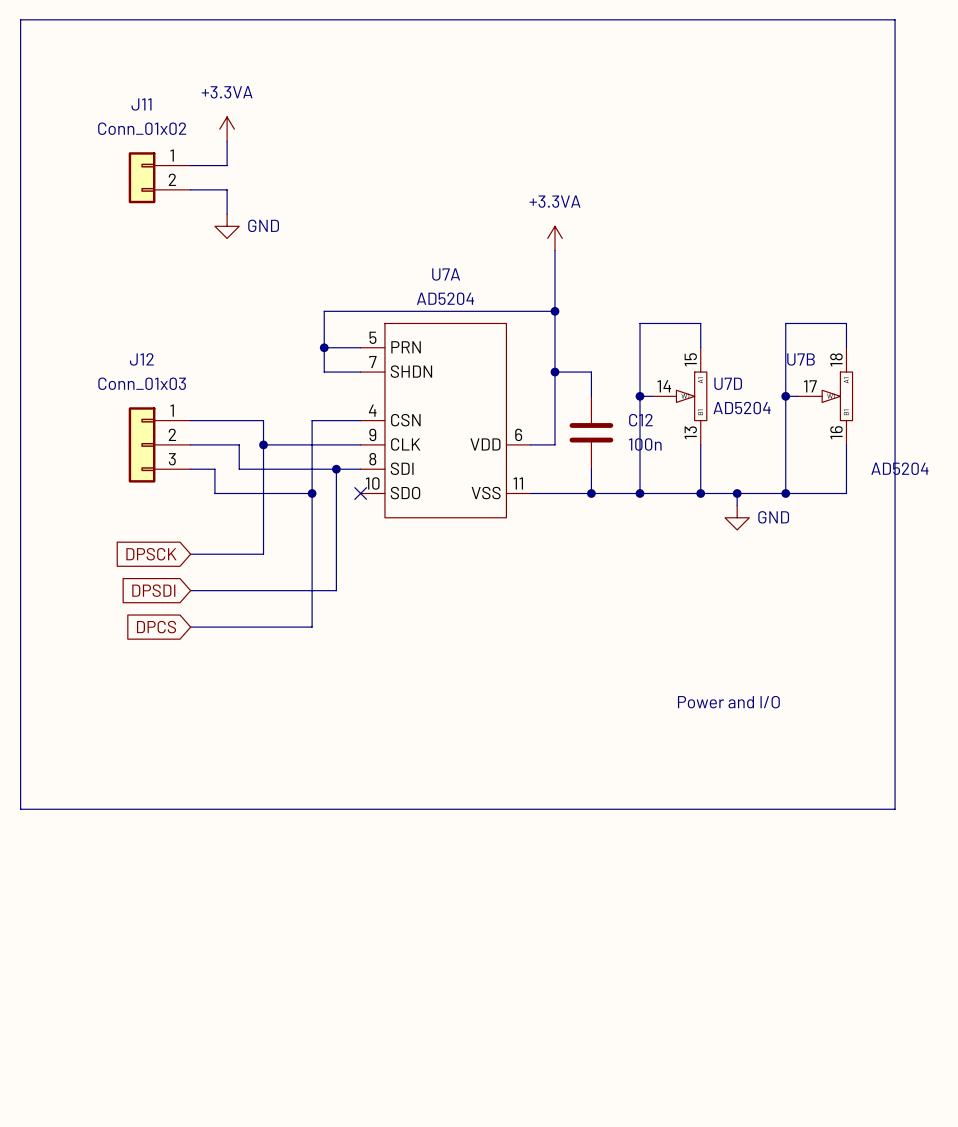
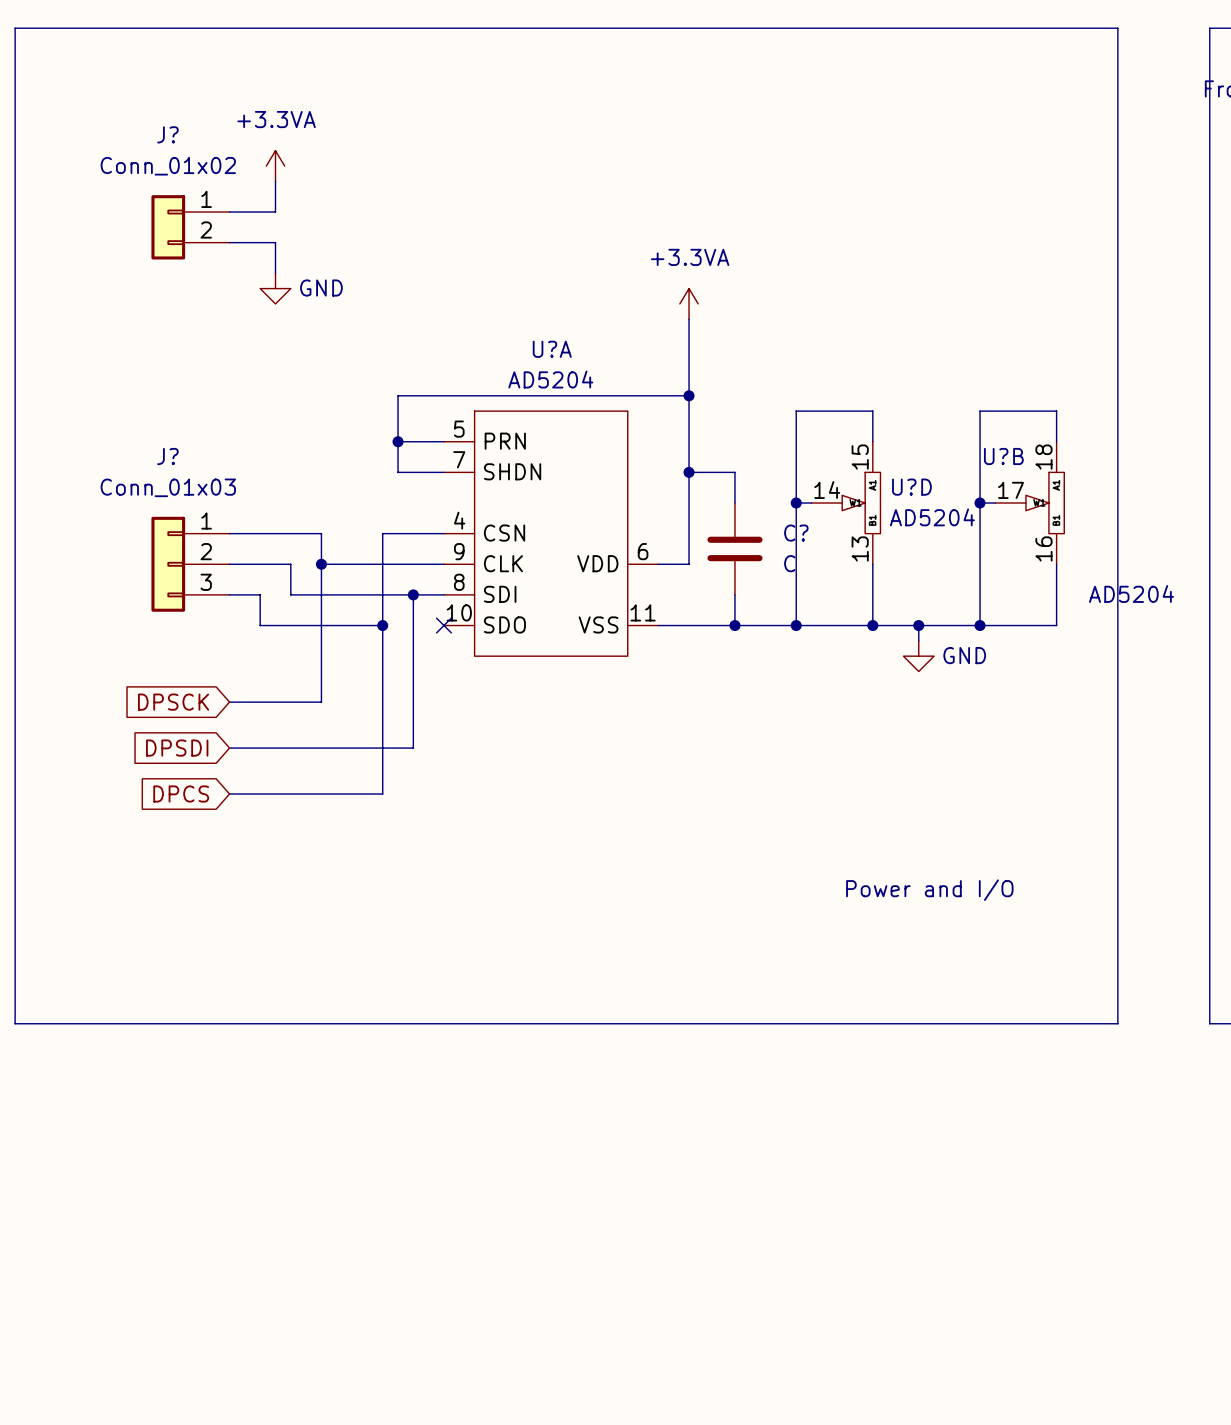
J11 name: J11 (141, 104) -> J? (167, 134)
U7A name: U7A (446, 274) -> U?A (552, 349)
J12 name: J12 (141, 359) -> J? (167, 456)
U7B name: U7B (801, 359) -> U?B (1003, 456)
U7D name: U7D (728, 383) -> U?D (911, 487)
C12 name: C12 (640, 420) -> C? (796, 533)
C12 value: 100n (645, 444) -> C (789, 563)

